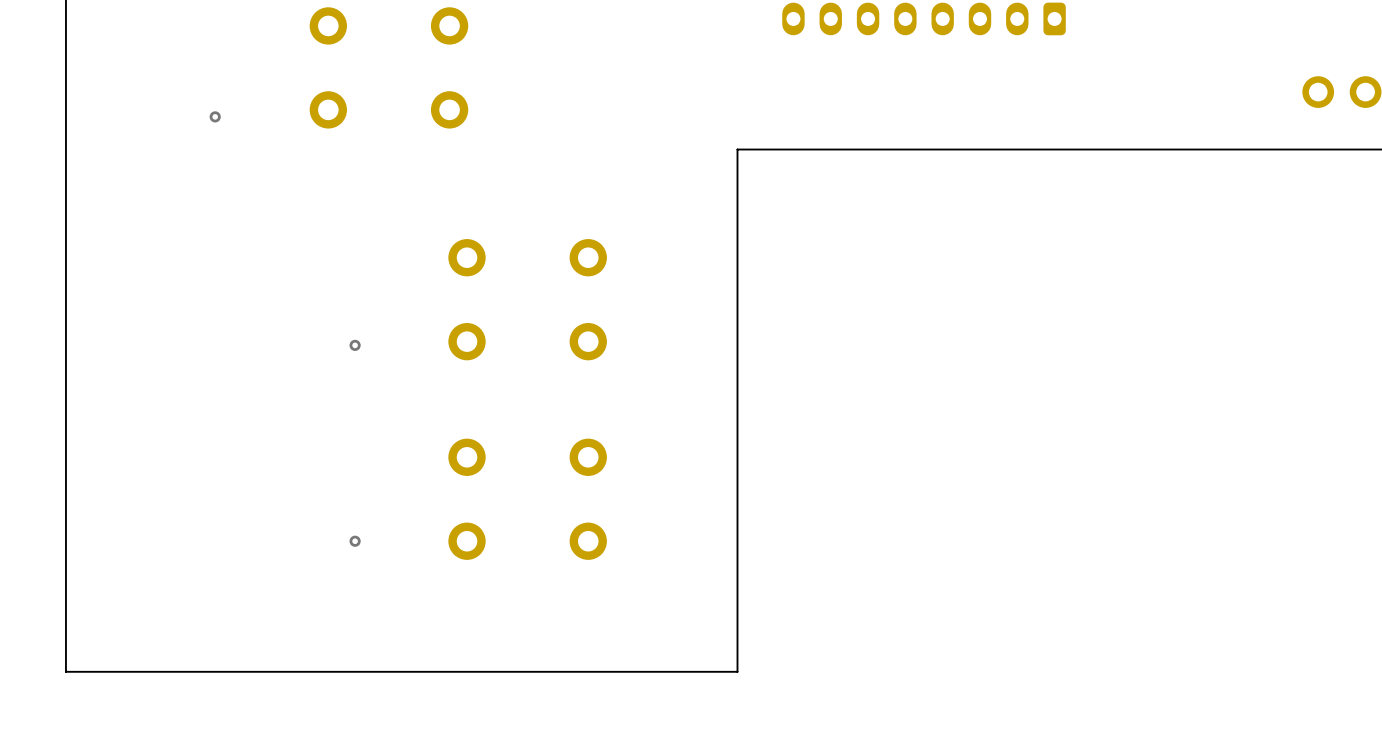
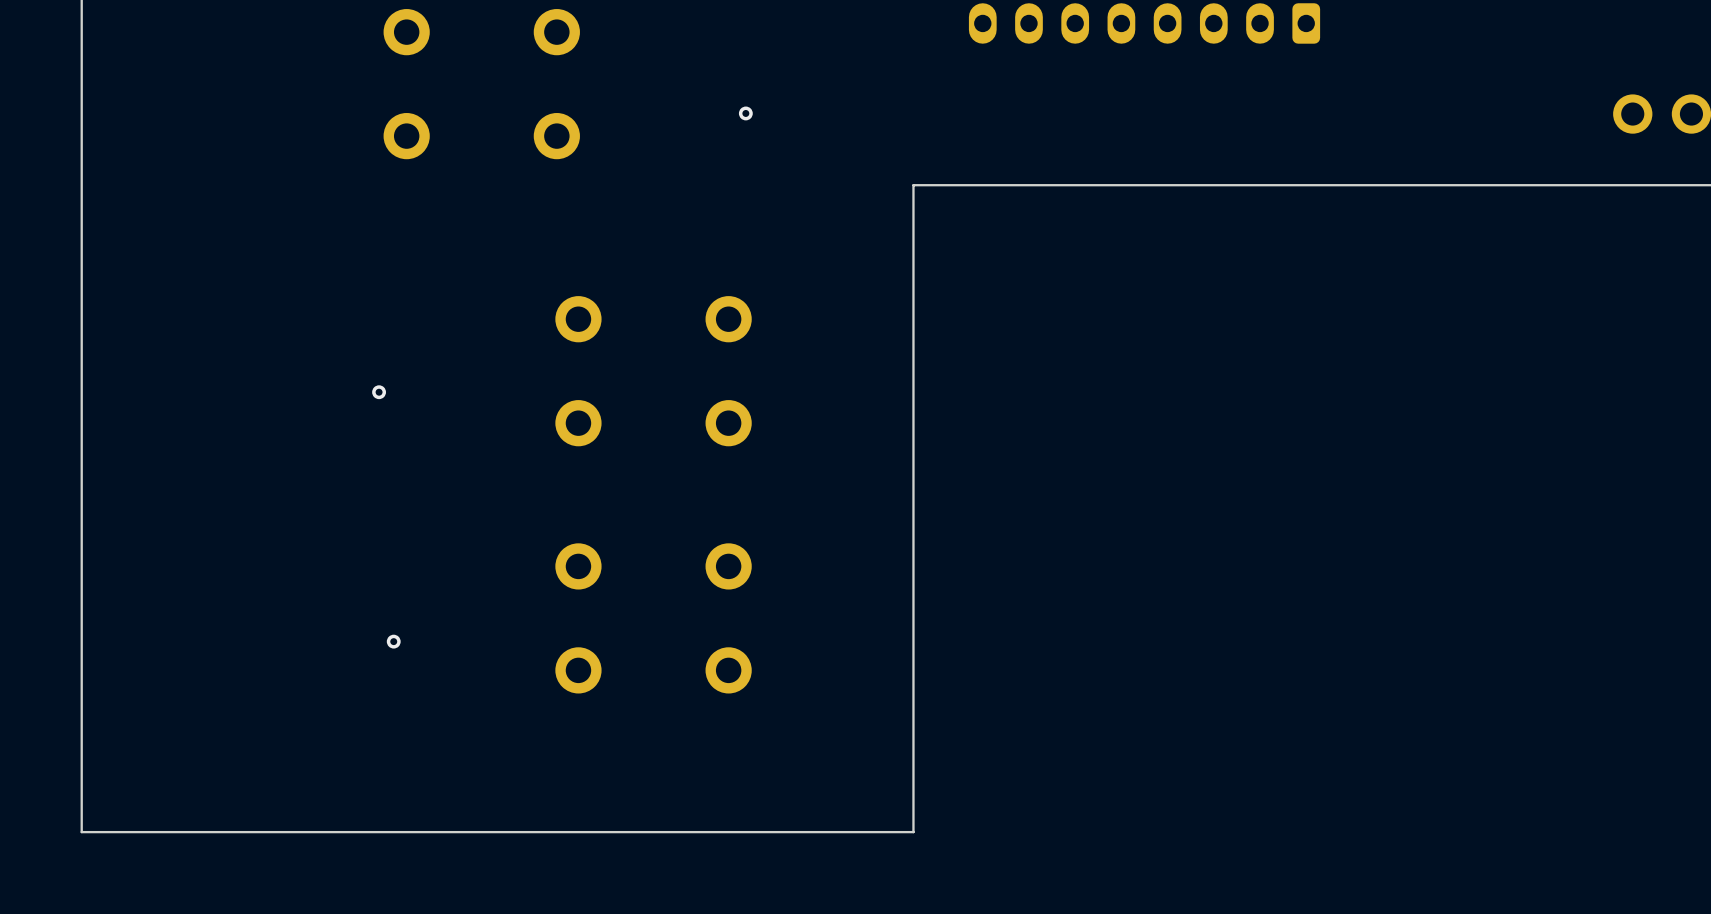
via: none -> (745, 113)
via: (215, 116) -> none
via position: (355, 345) -> (379, 392)
via position: (355, 541) -> (393, 641)

